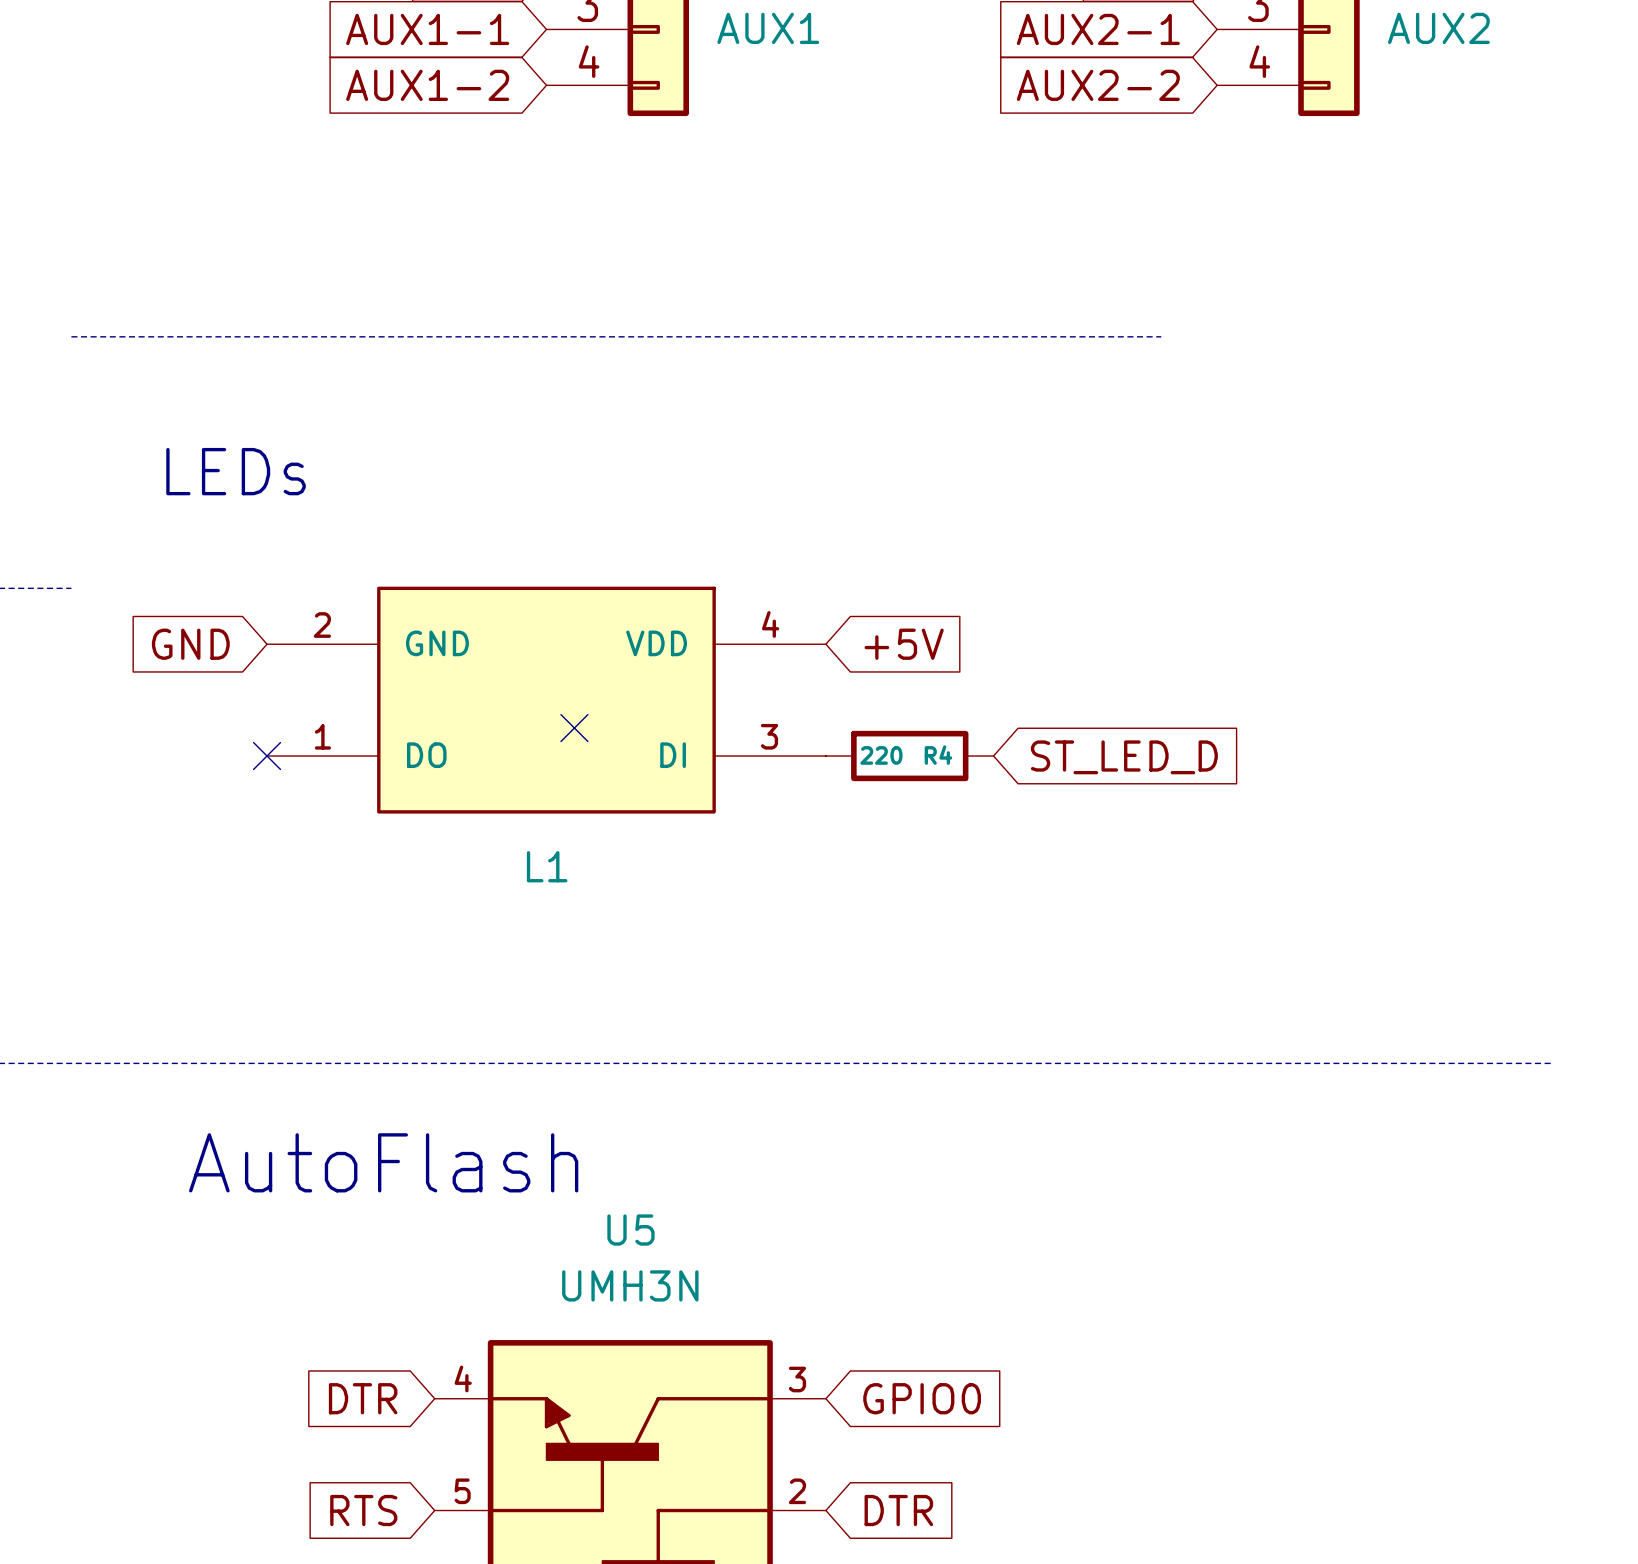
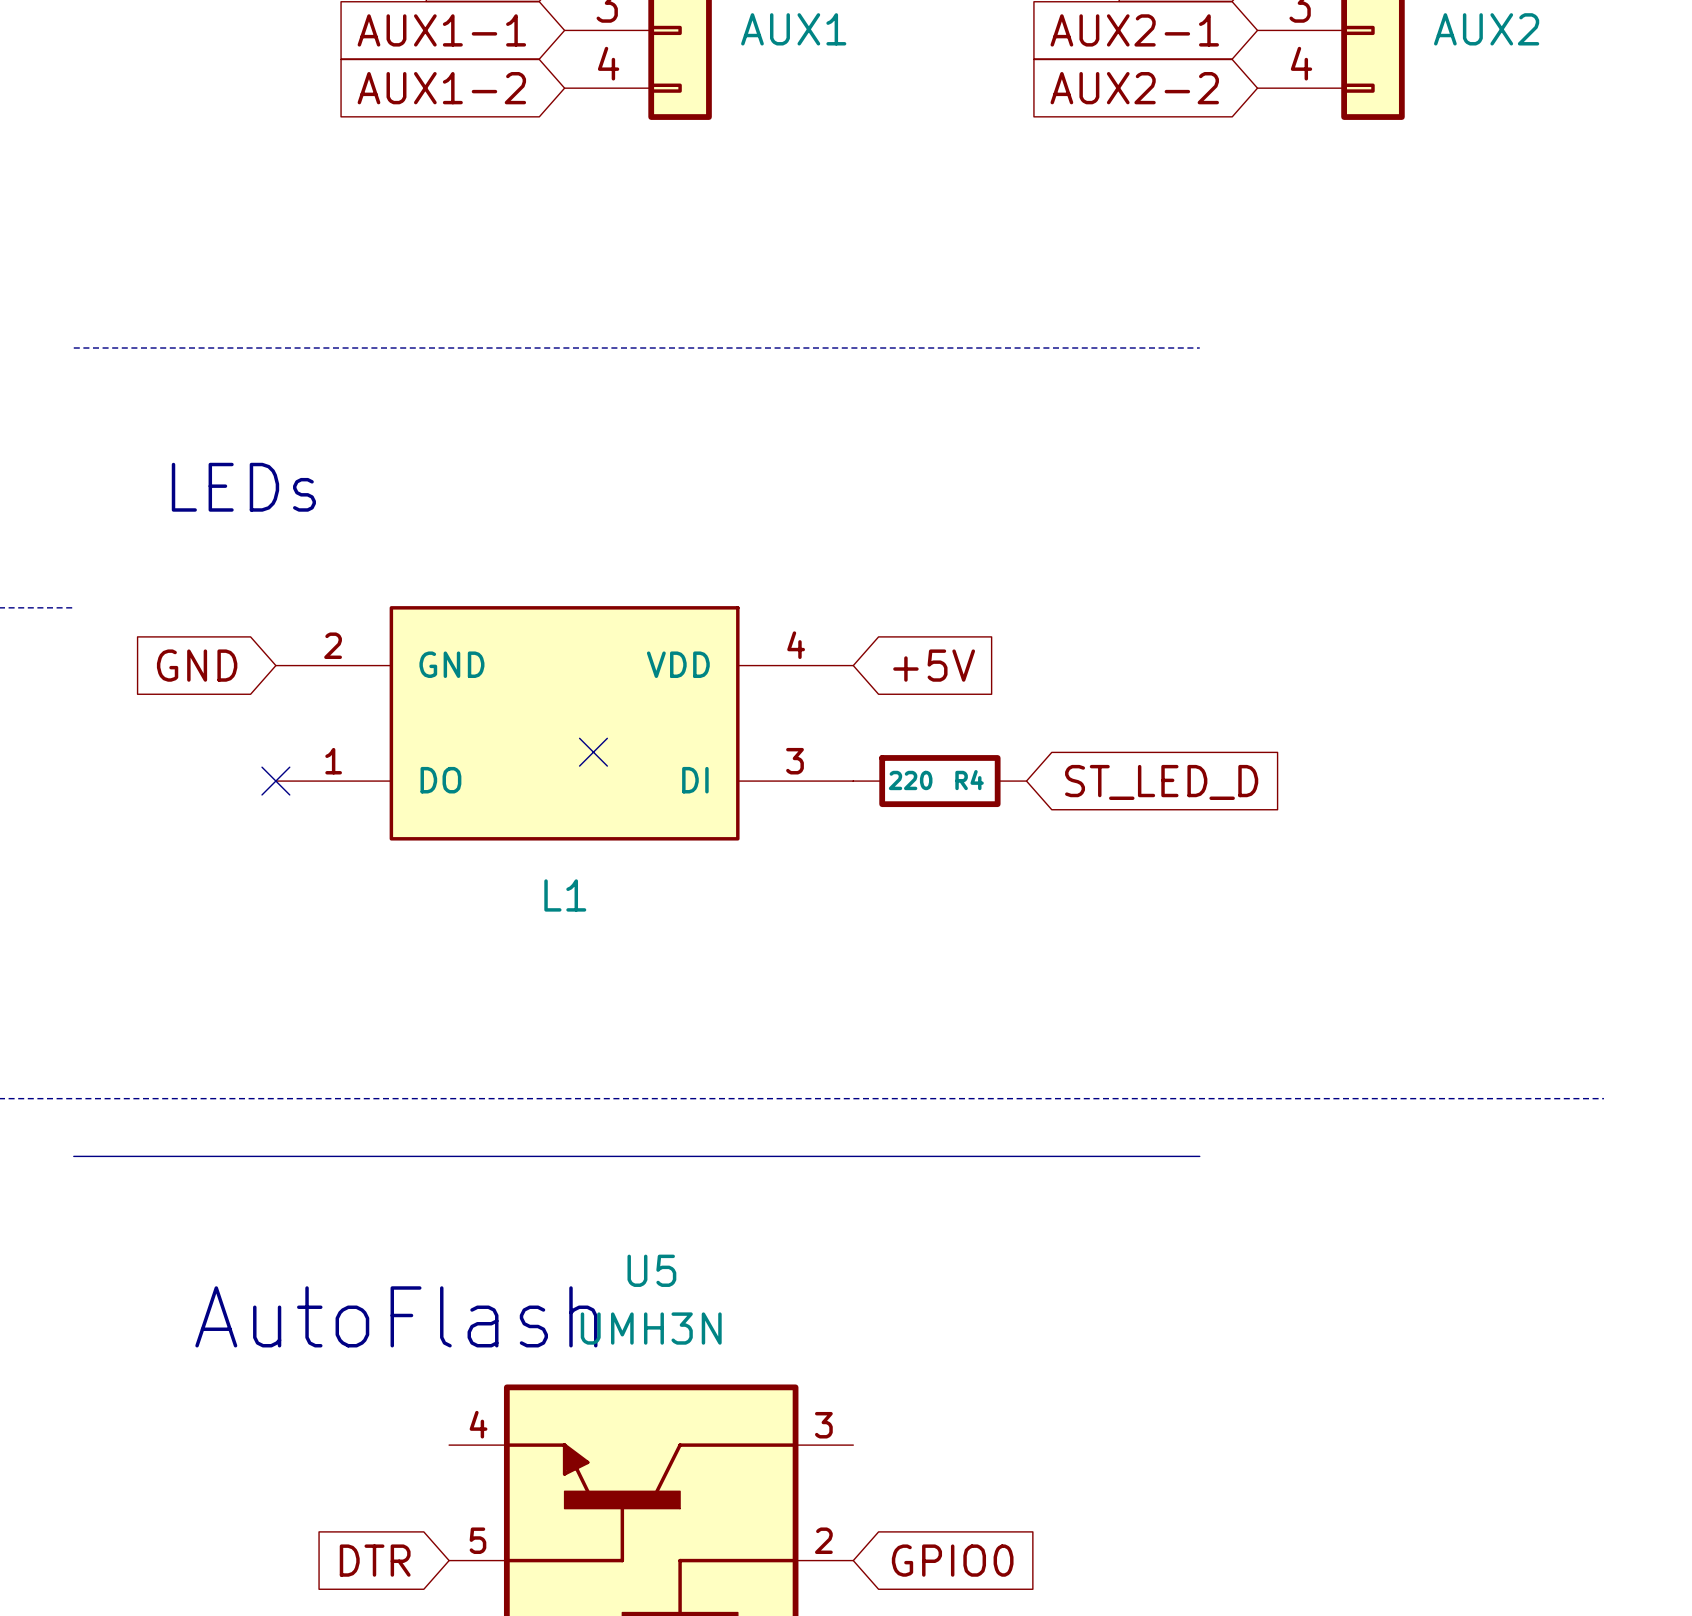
line: none -> (73, 1156) (1199, 1156)
text position: AutoFlash (383, 1162) -> AutoFlash (396, 1316)
global label: DTR (363, 1398) -> none
global label: GPIO0 (922, 1398) -> none
global label: RTS (363, 1510) -> DTR (375, 1560)
global label: DTR (898, 1510) -> GPIO0 (952, 1560)

